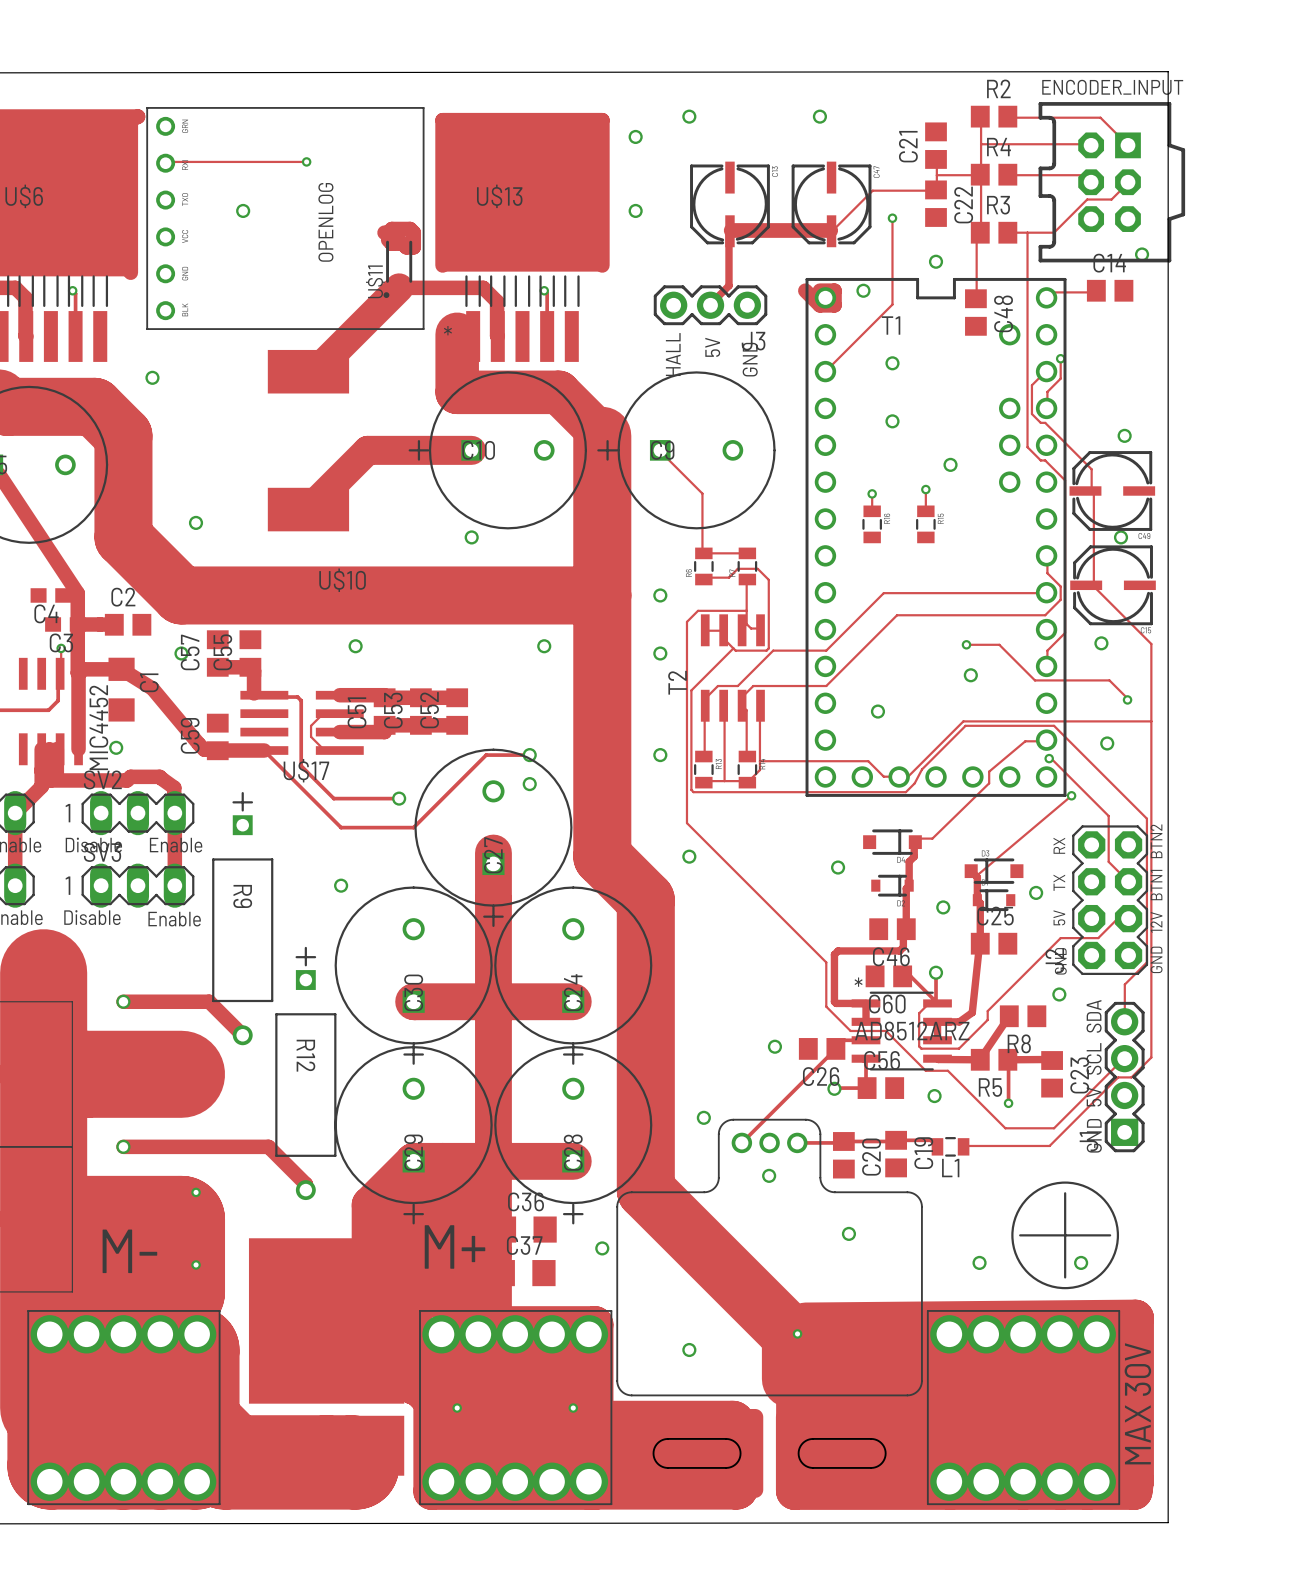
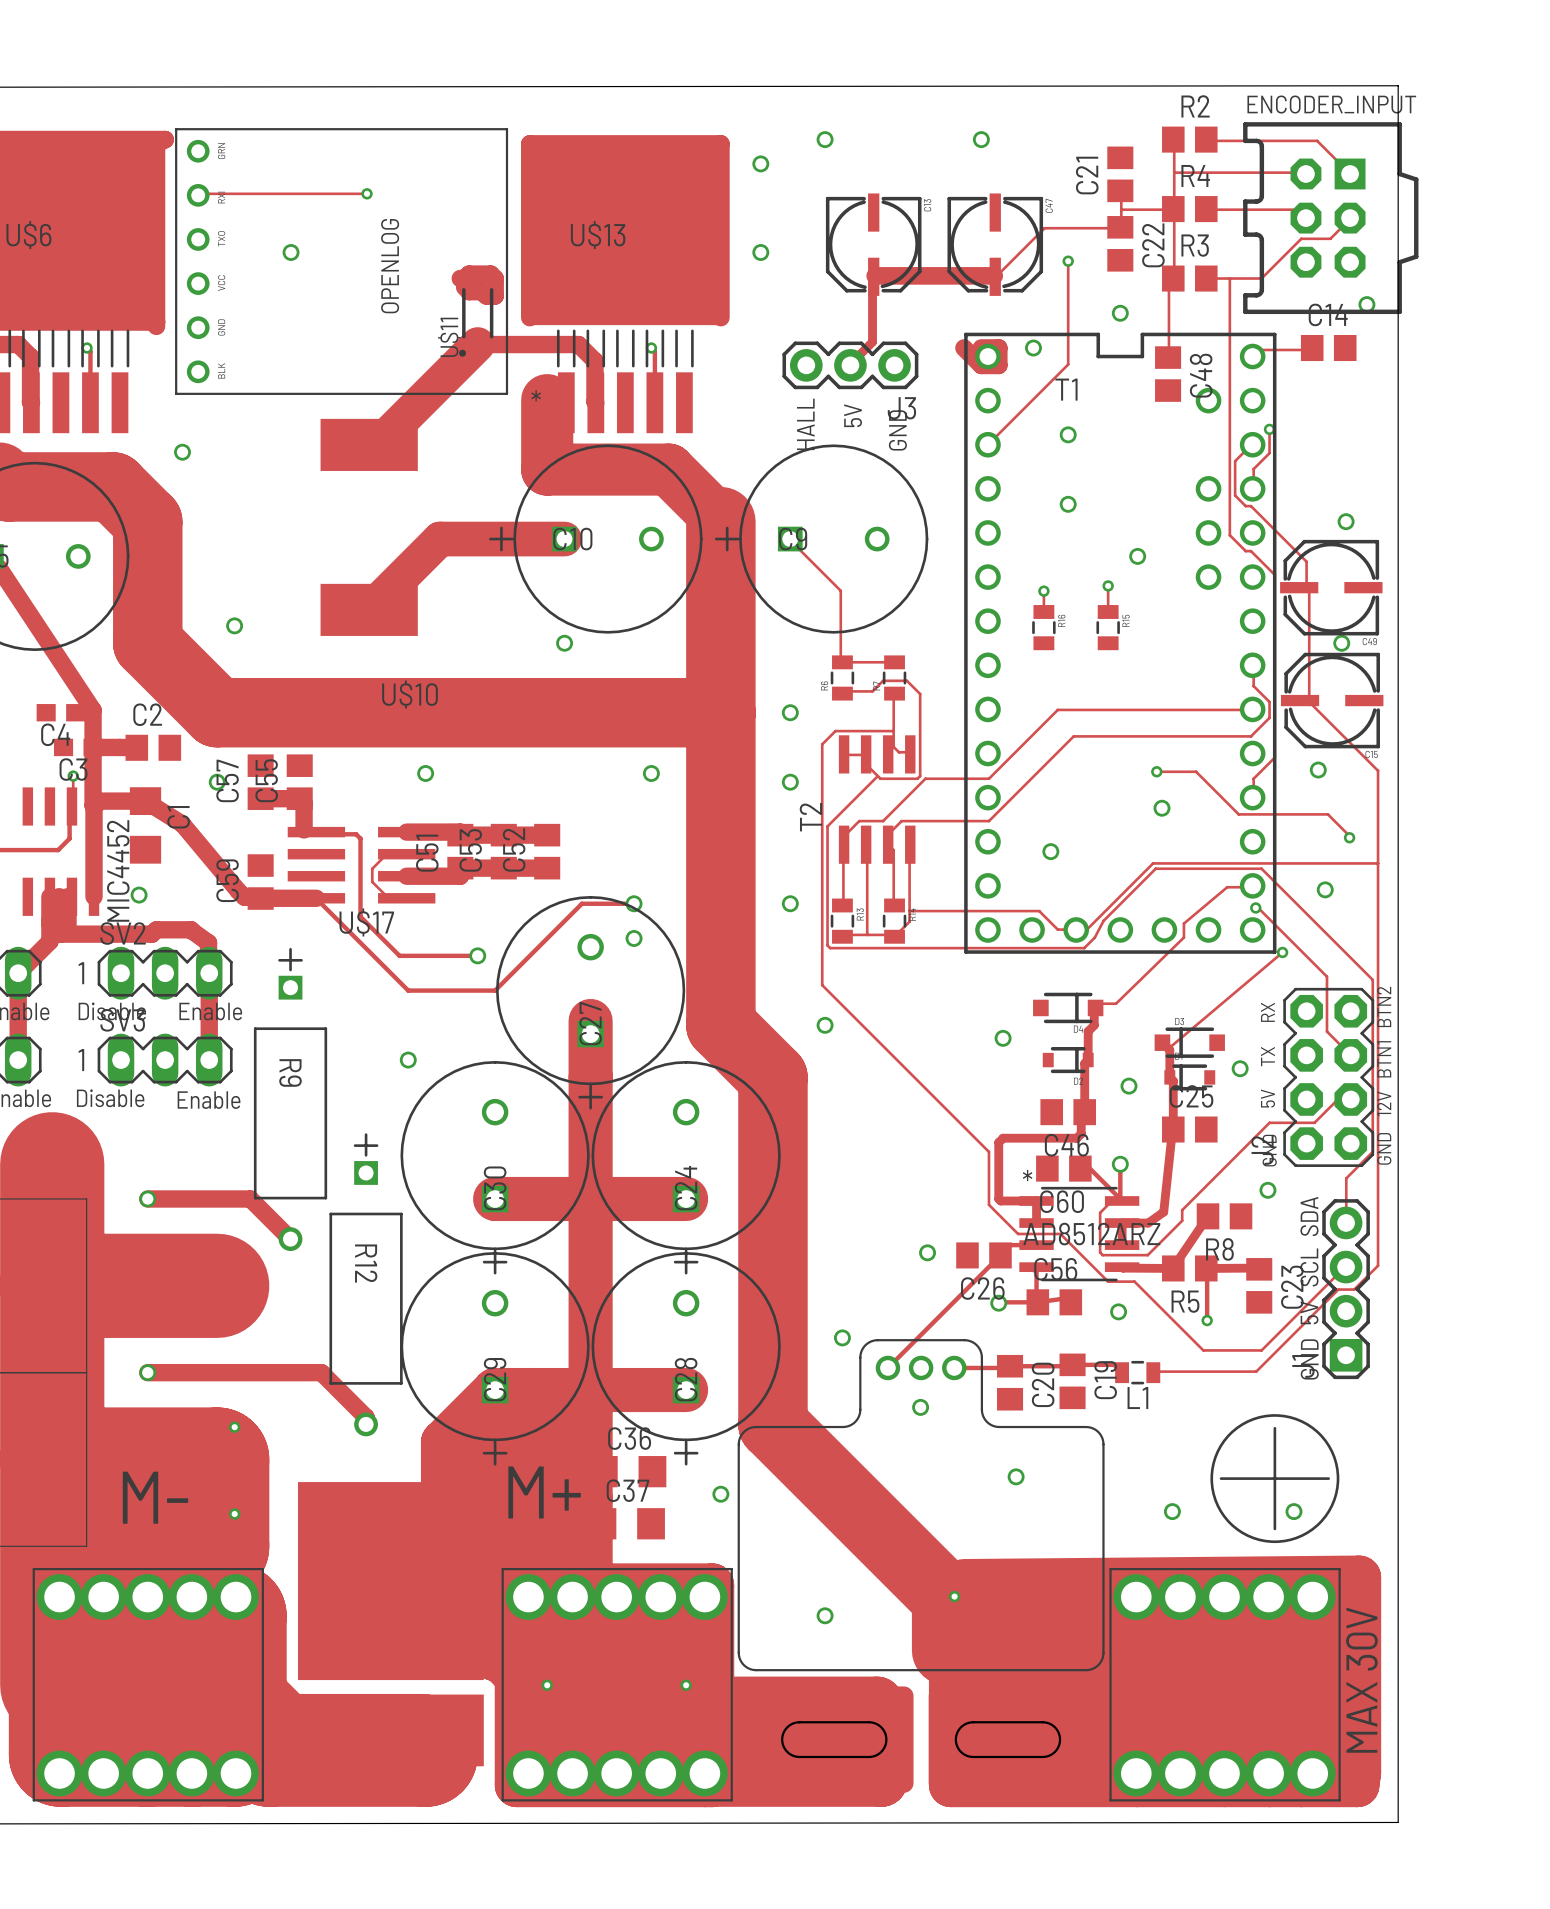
track: none -> (1062, 1298) (1037, 1302)

